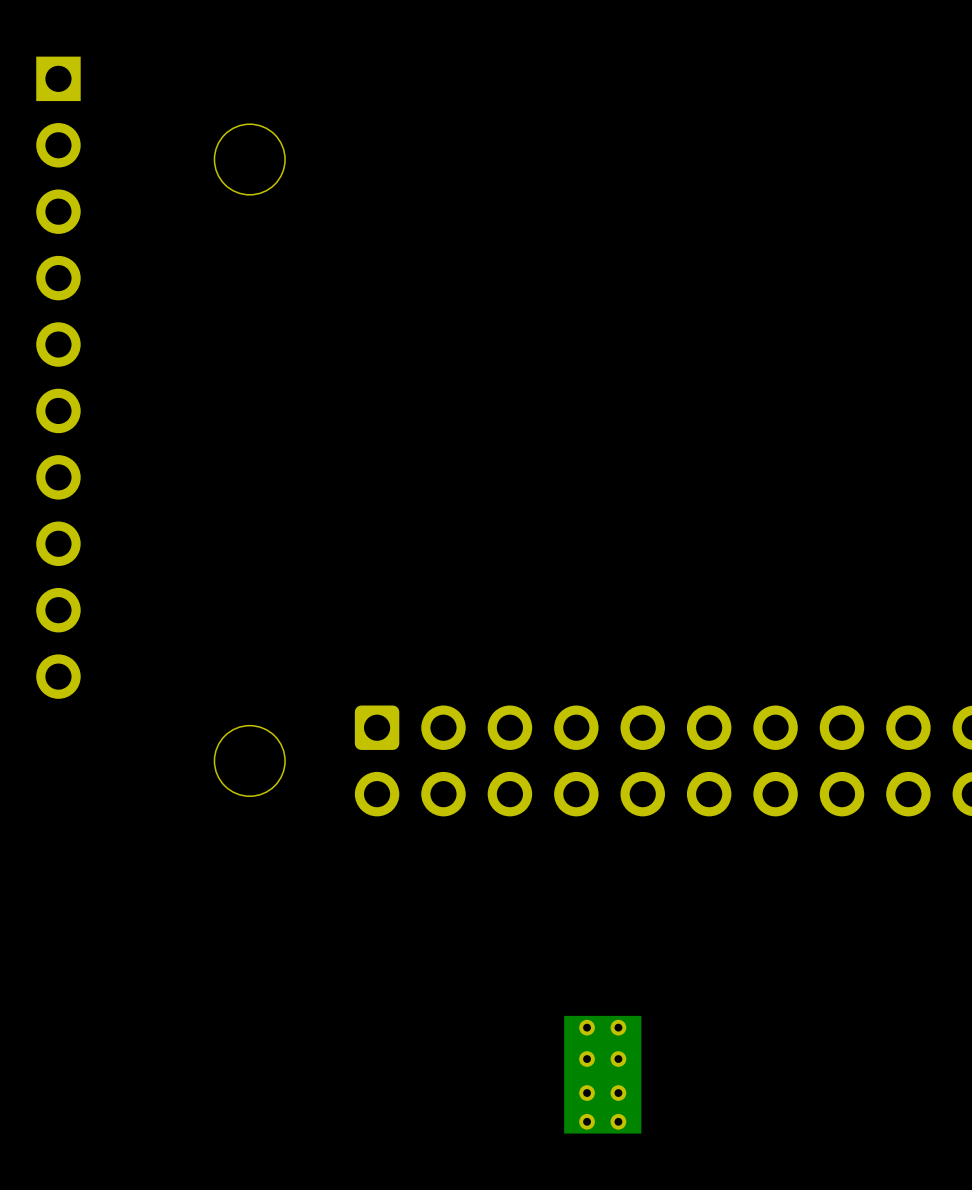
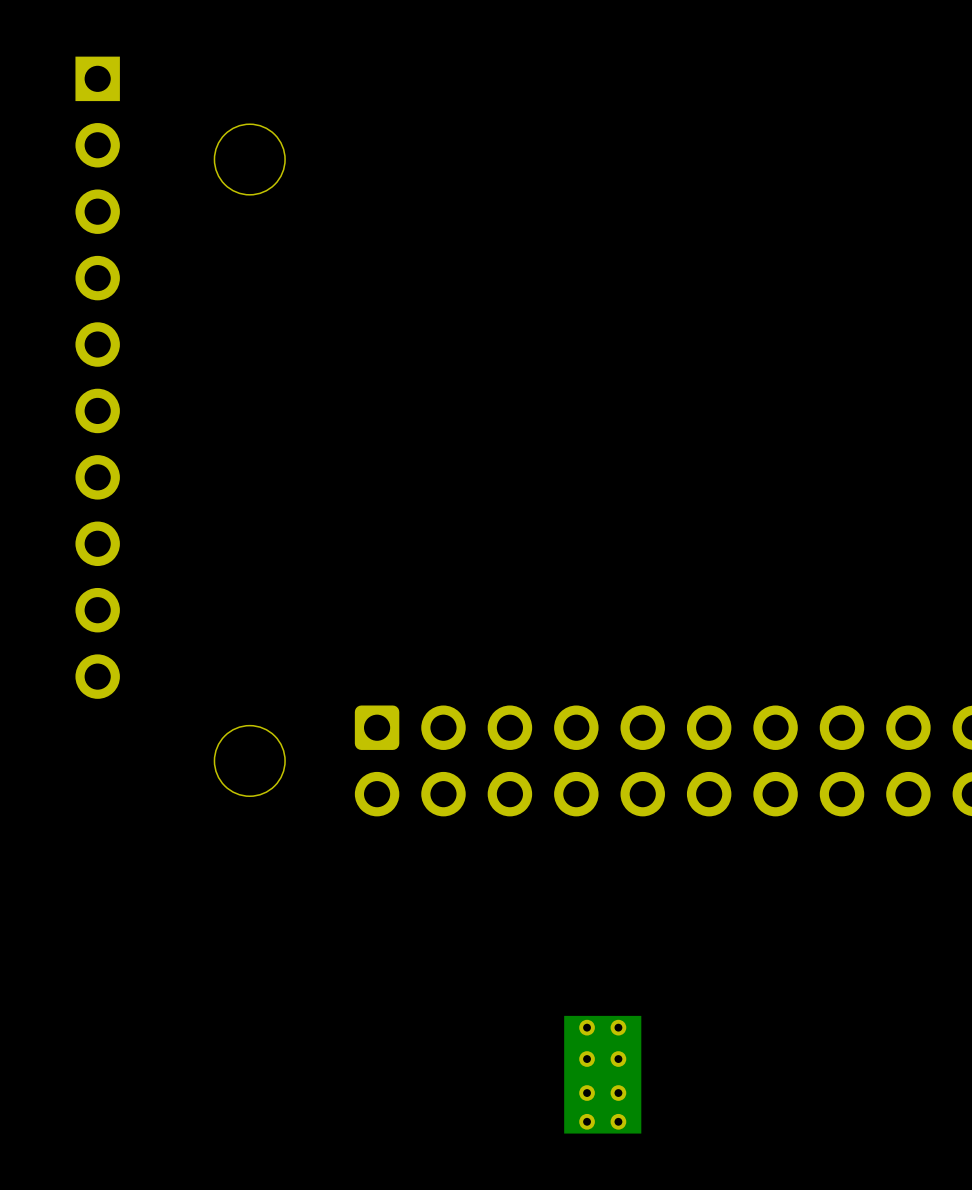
part position: (58, 377) -> (97, 377)

